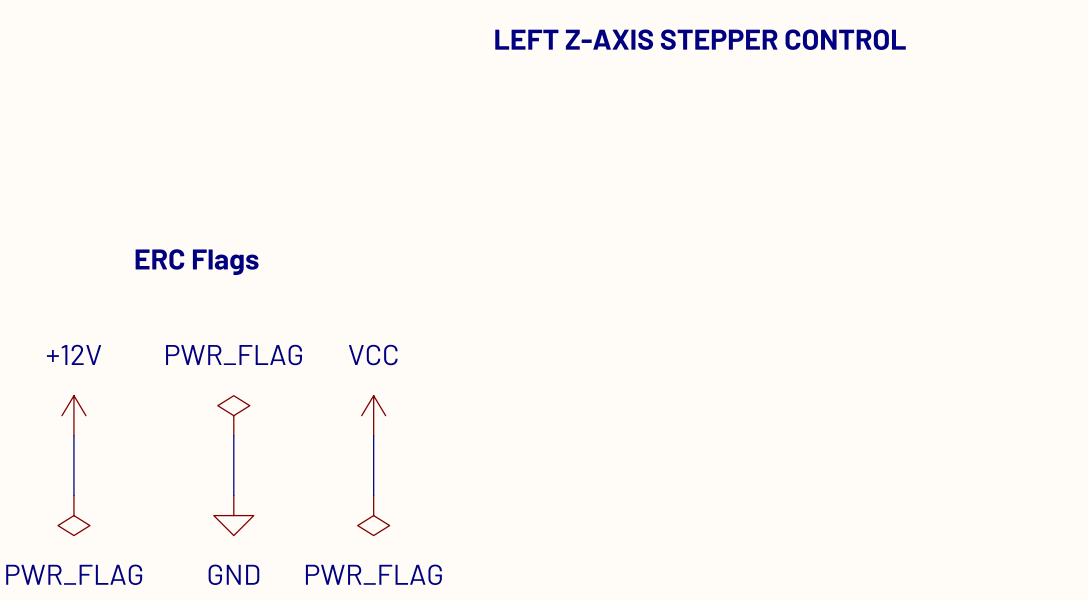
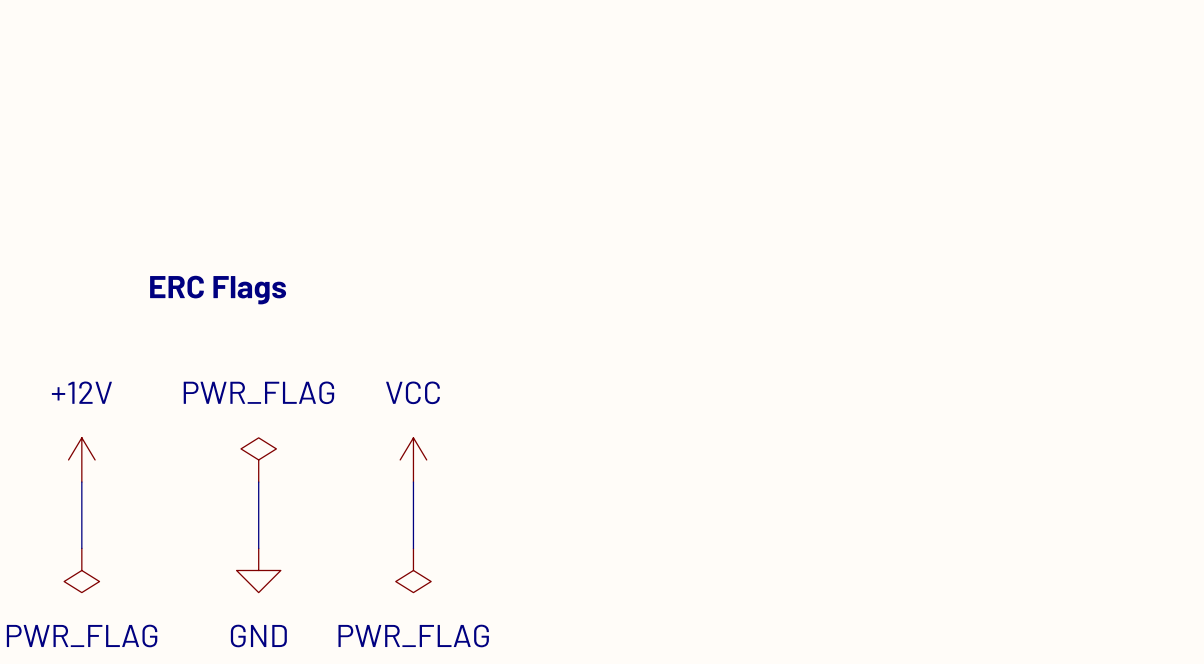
text: LEFT Z-AXIS STEPPER CONTROL (700, 39) -> none

